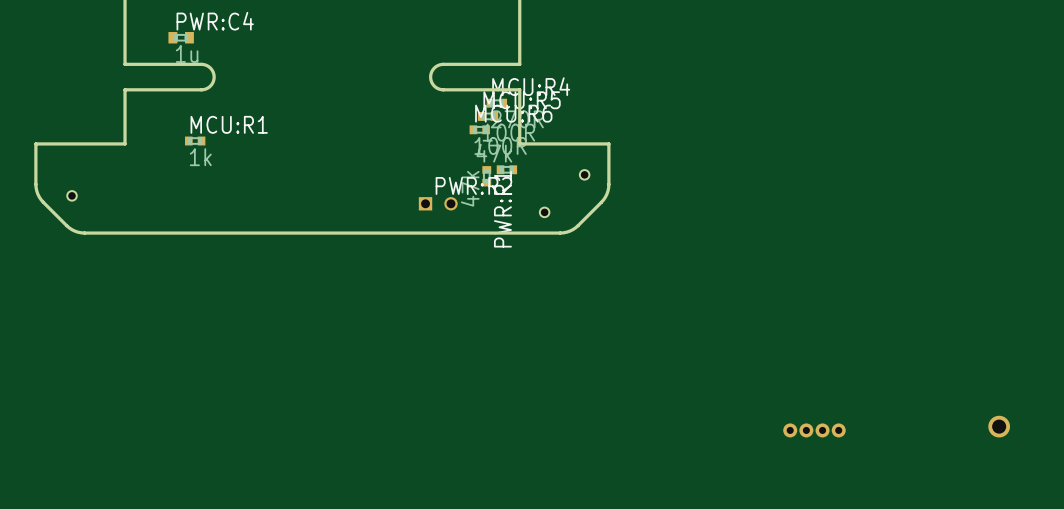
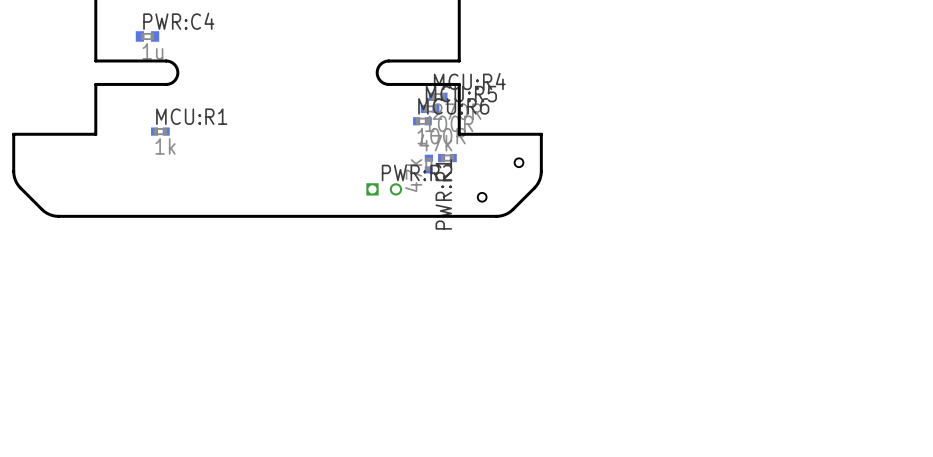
part: (72, 195) -> none
part: (999, 426) -> none
part: (814, 430) -> none

